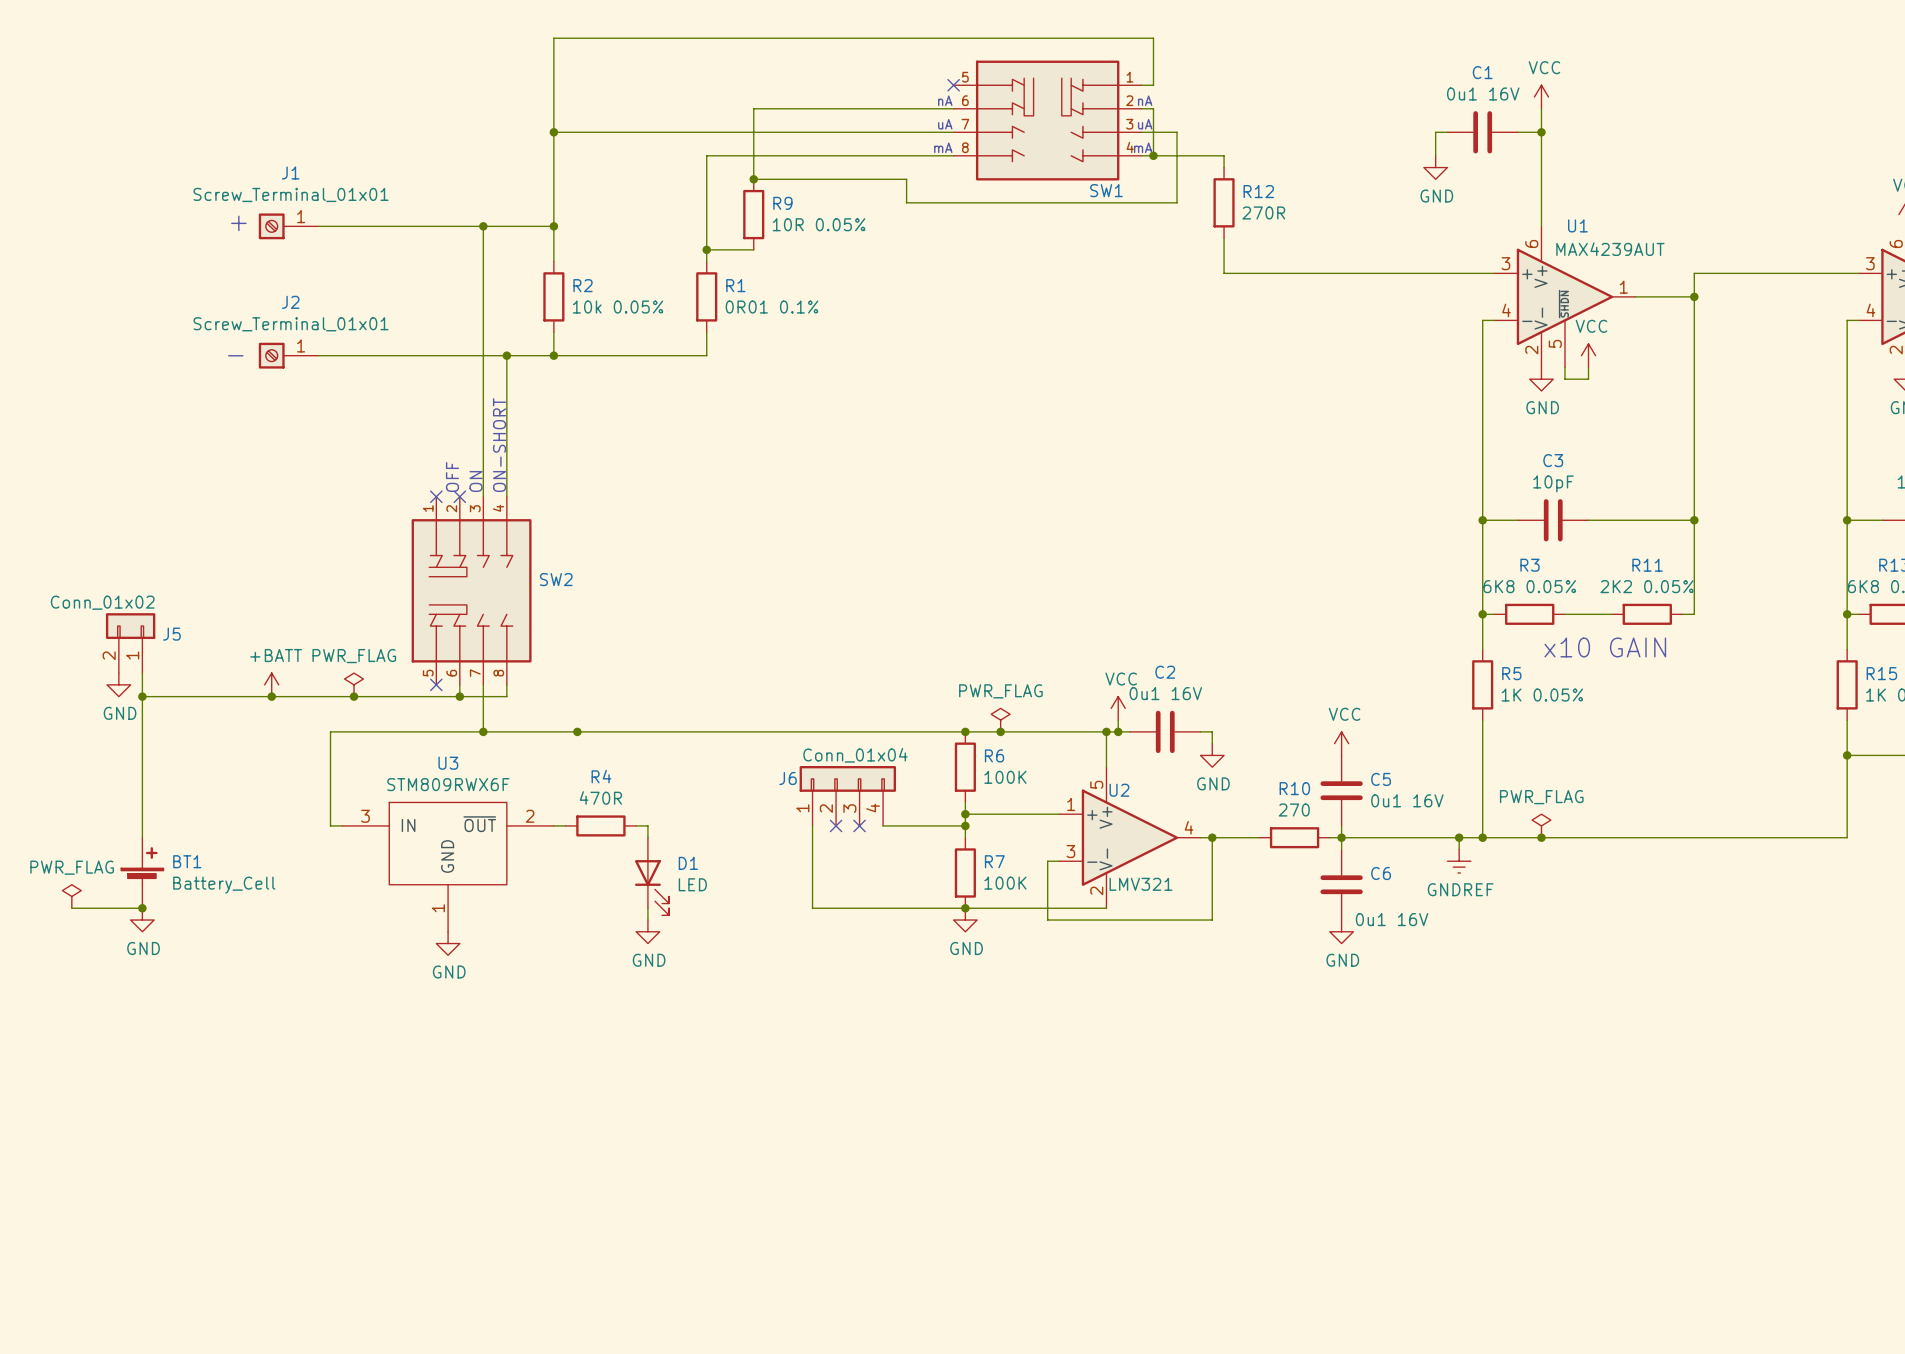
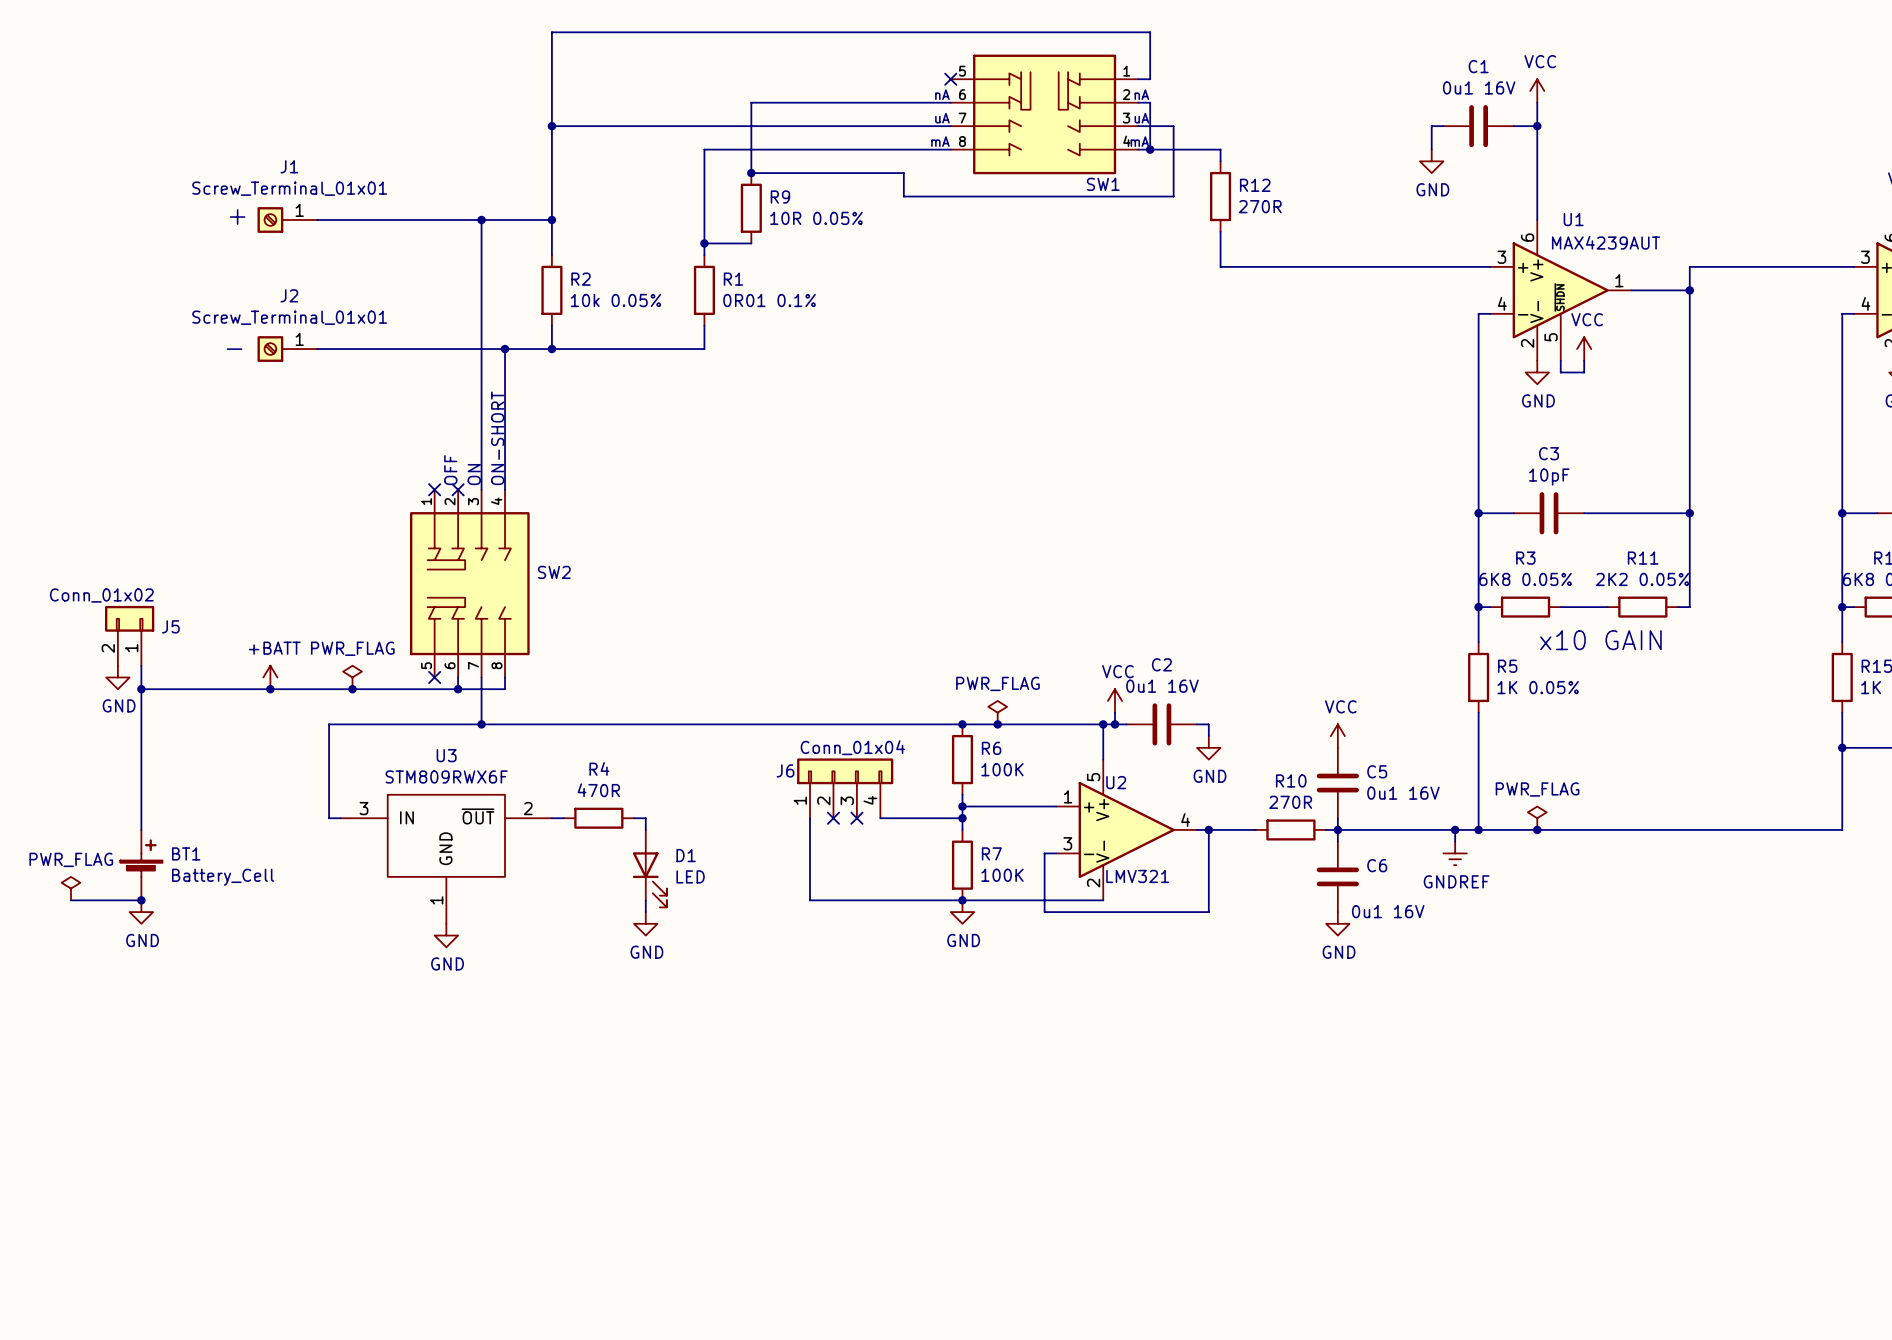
junction: (577, 731) -> none
R10 value: 270 (1294, 810) -> 270R (1290, 802)

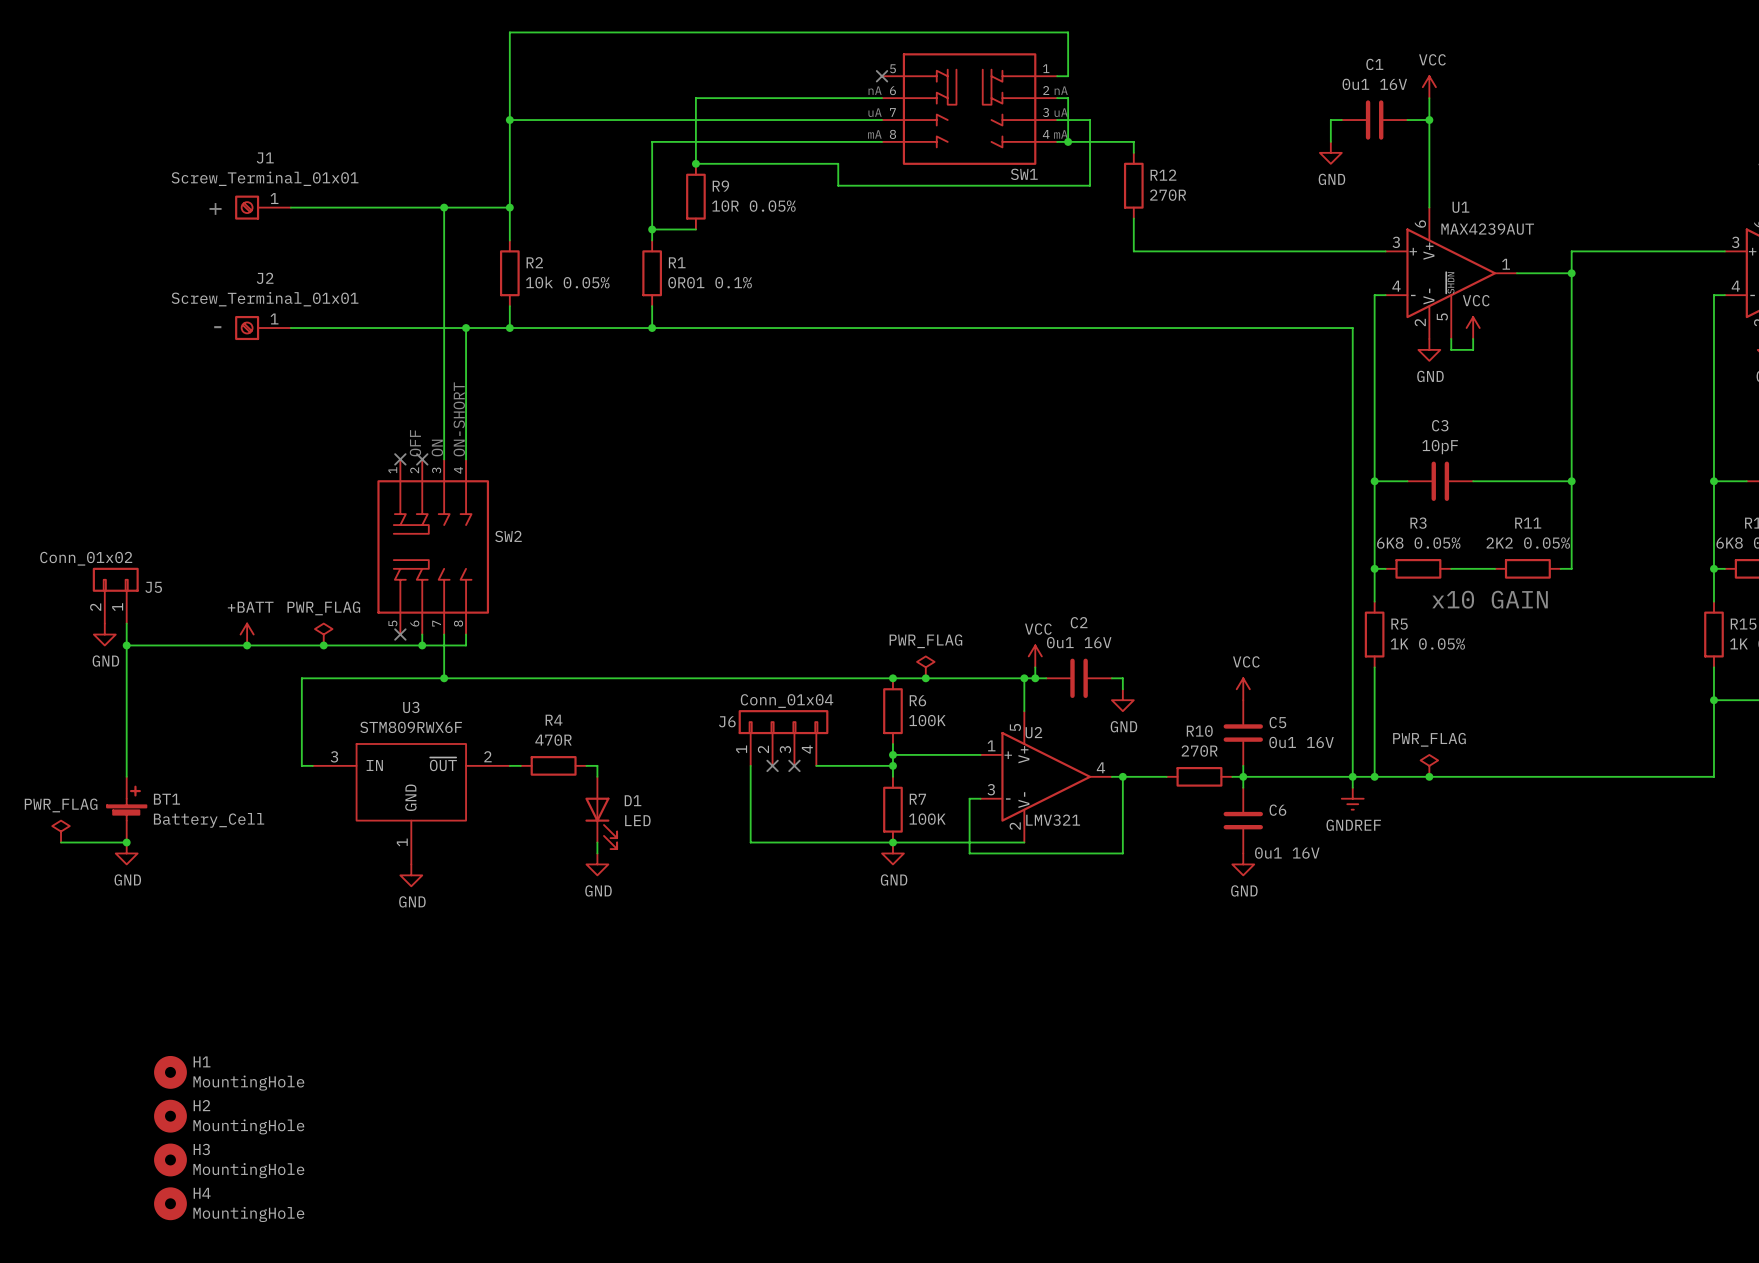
wire: none -> (652, 328) (1352, 328) (1352, 776)
junction: none -> (652, 328)
H1: none -> MountingHole (170, 1072)
H2: none -> MountingHole (170, 1116)
H3: none -> MountingHole (170, 1159)
H4: none -> MountingHole (170, 1203)

